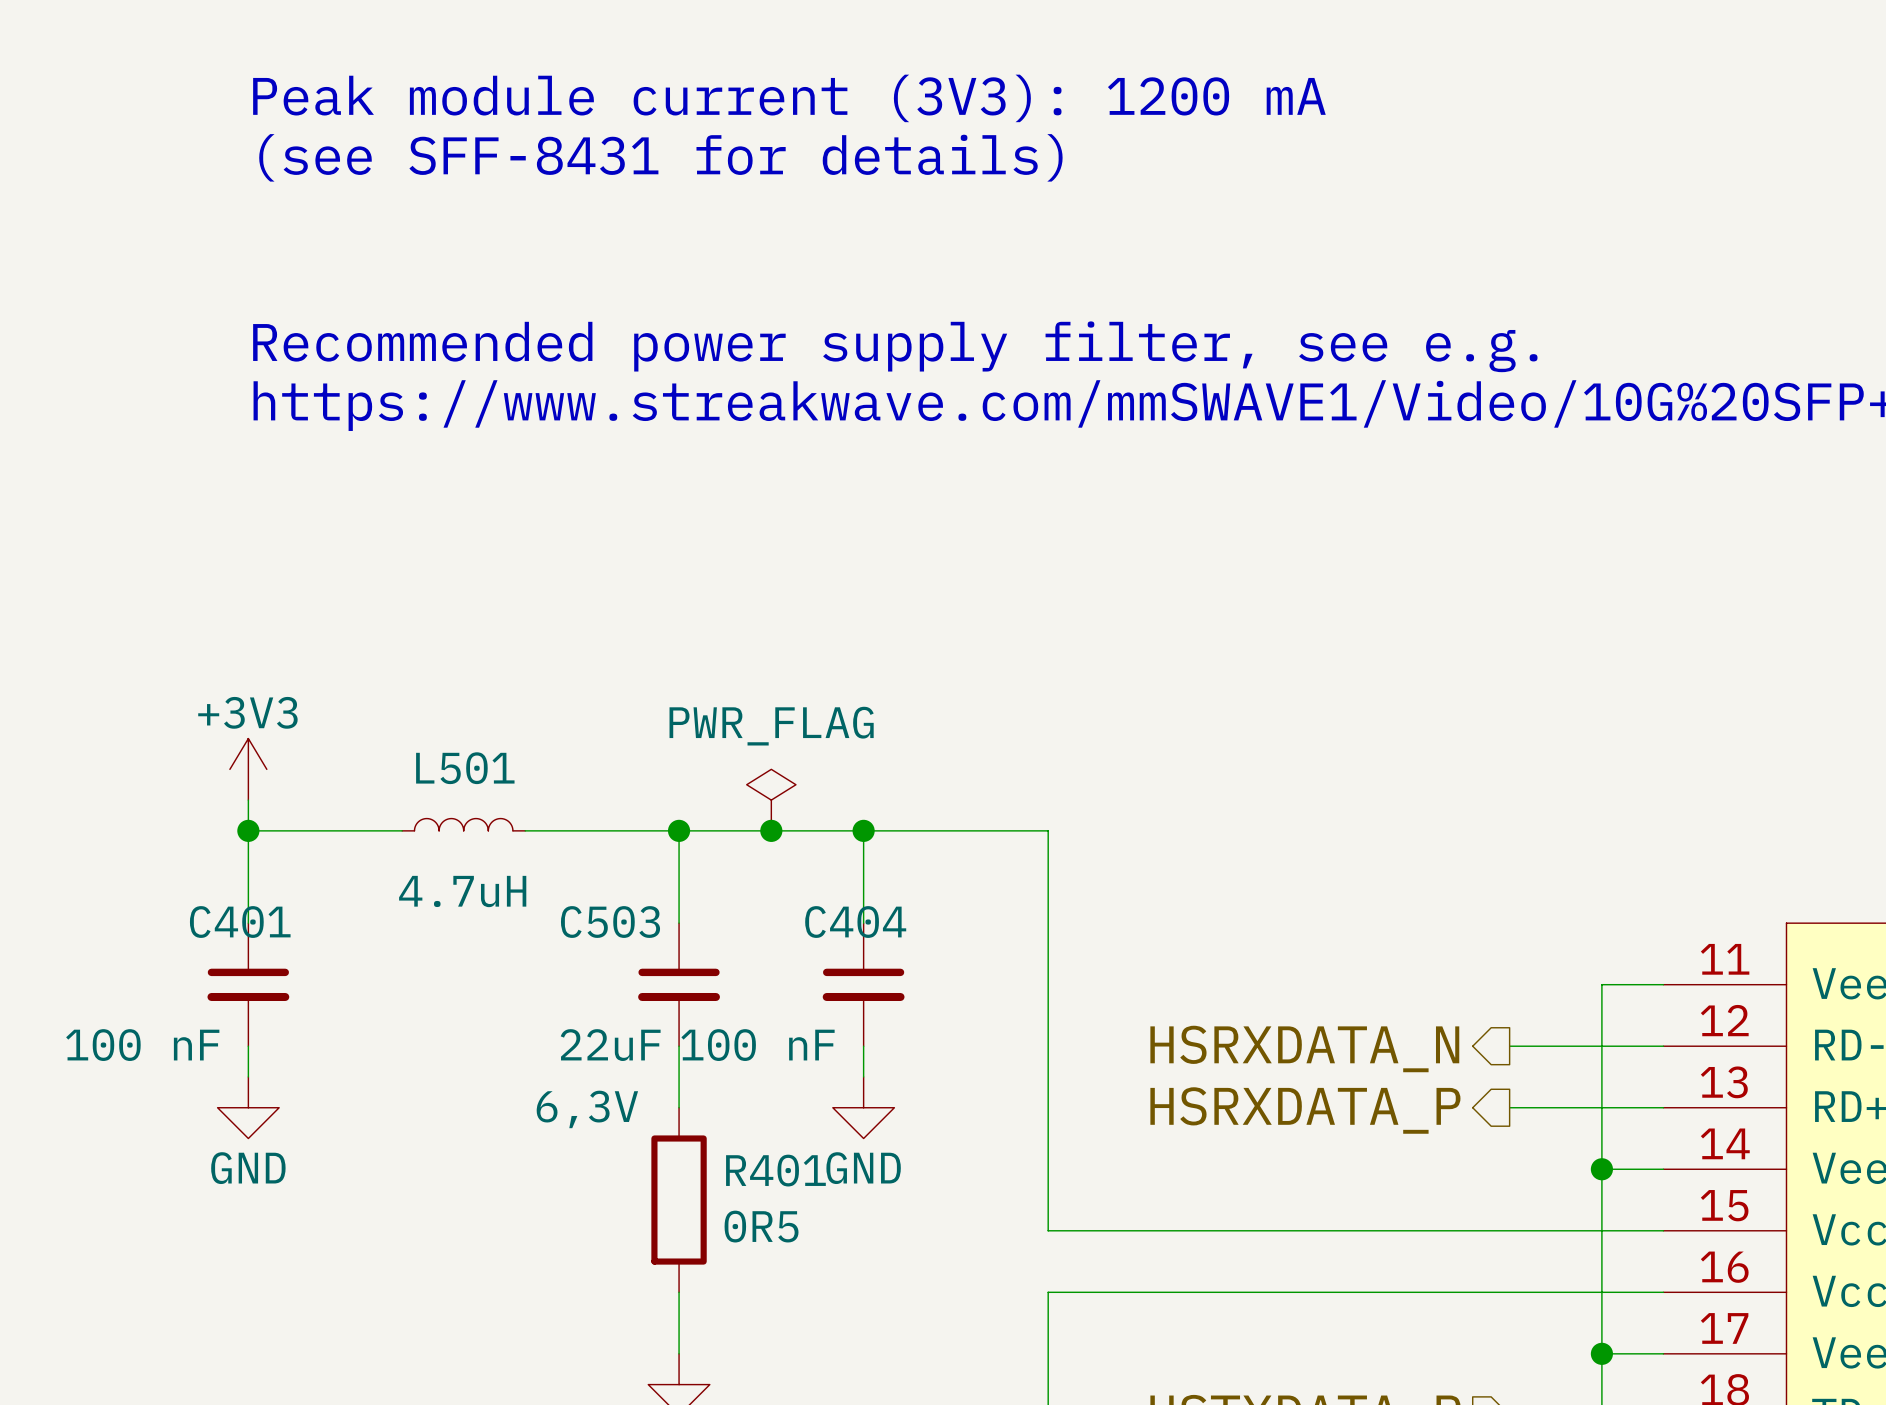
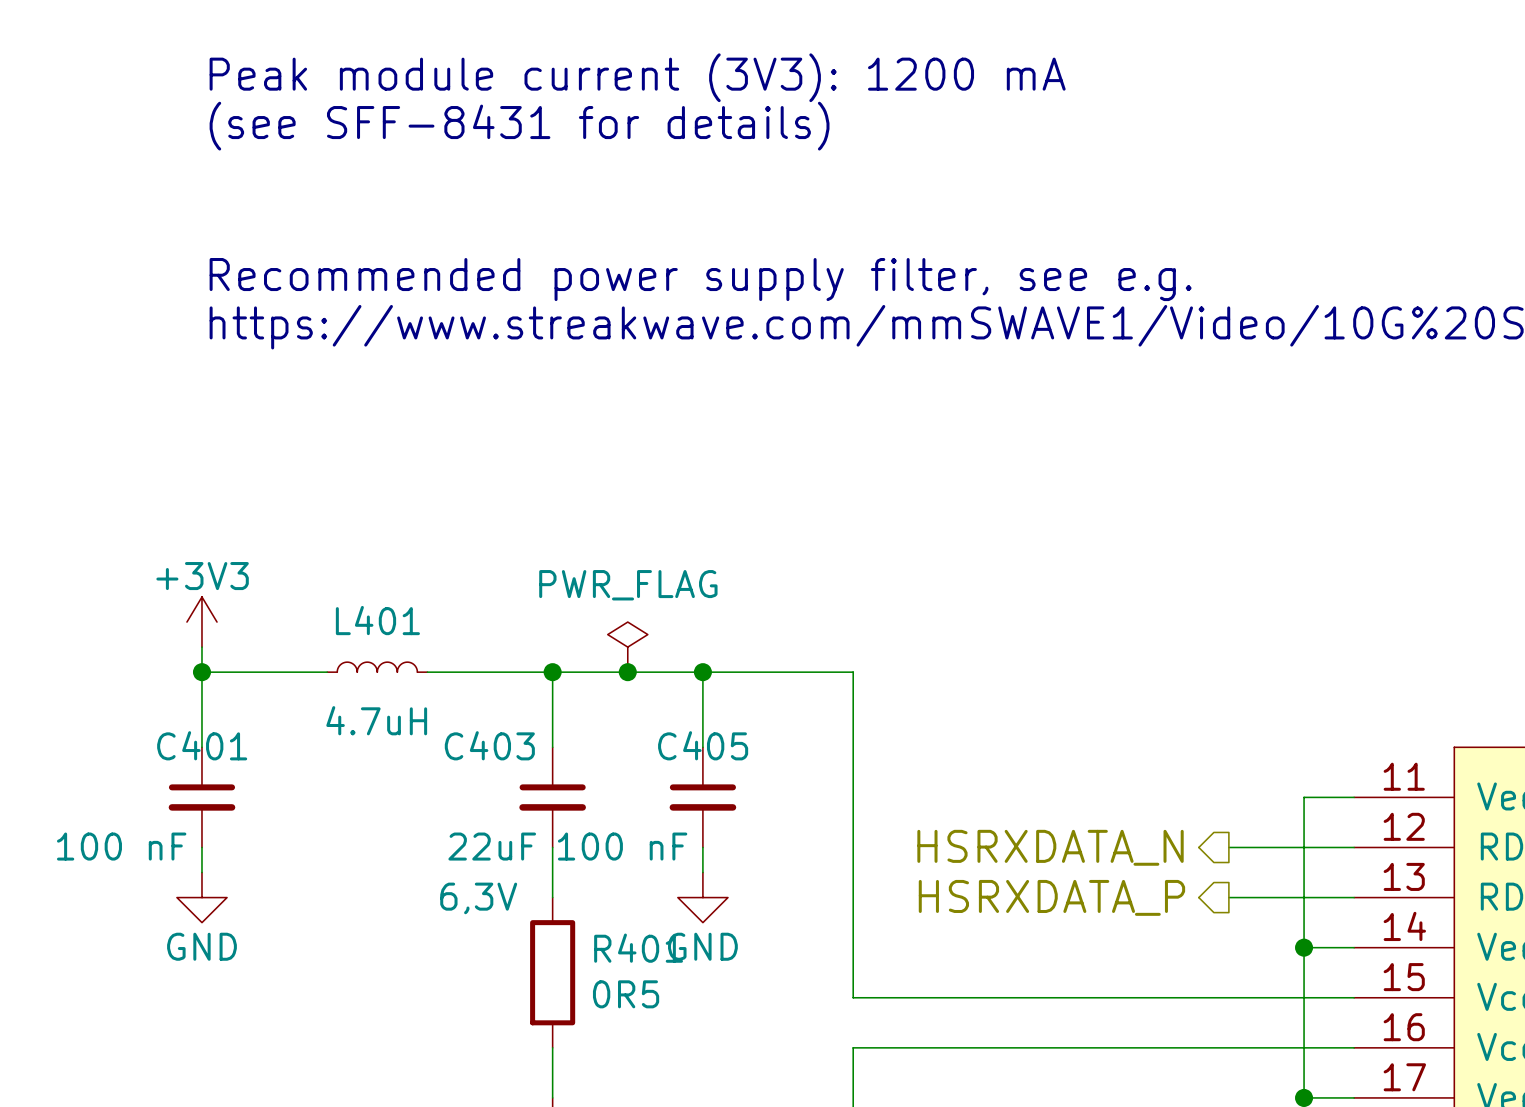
L501 name: L501 (465, 768) -> L401 (377, 620)
C503 name: C503 (610, 922) -> C403 (489, 745)
C404 name: C404 (855, 922) -> C405 (703, 745)

